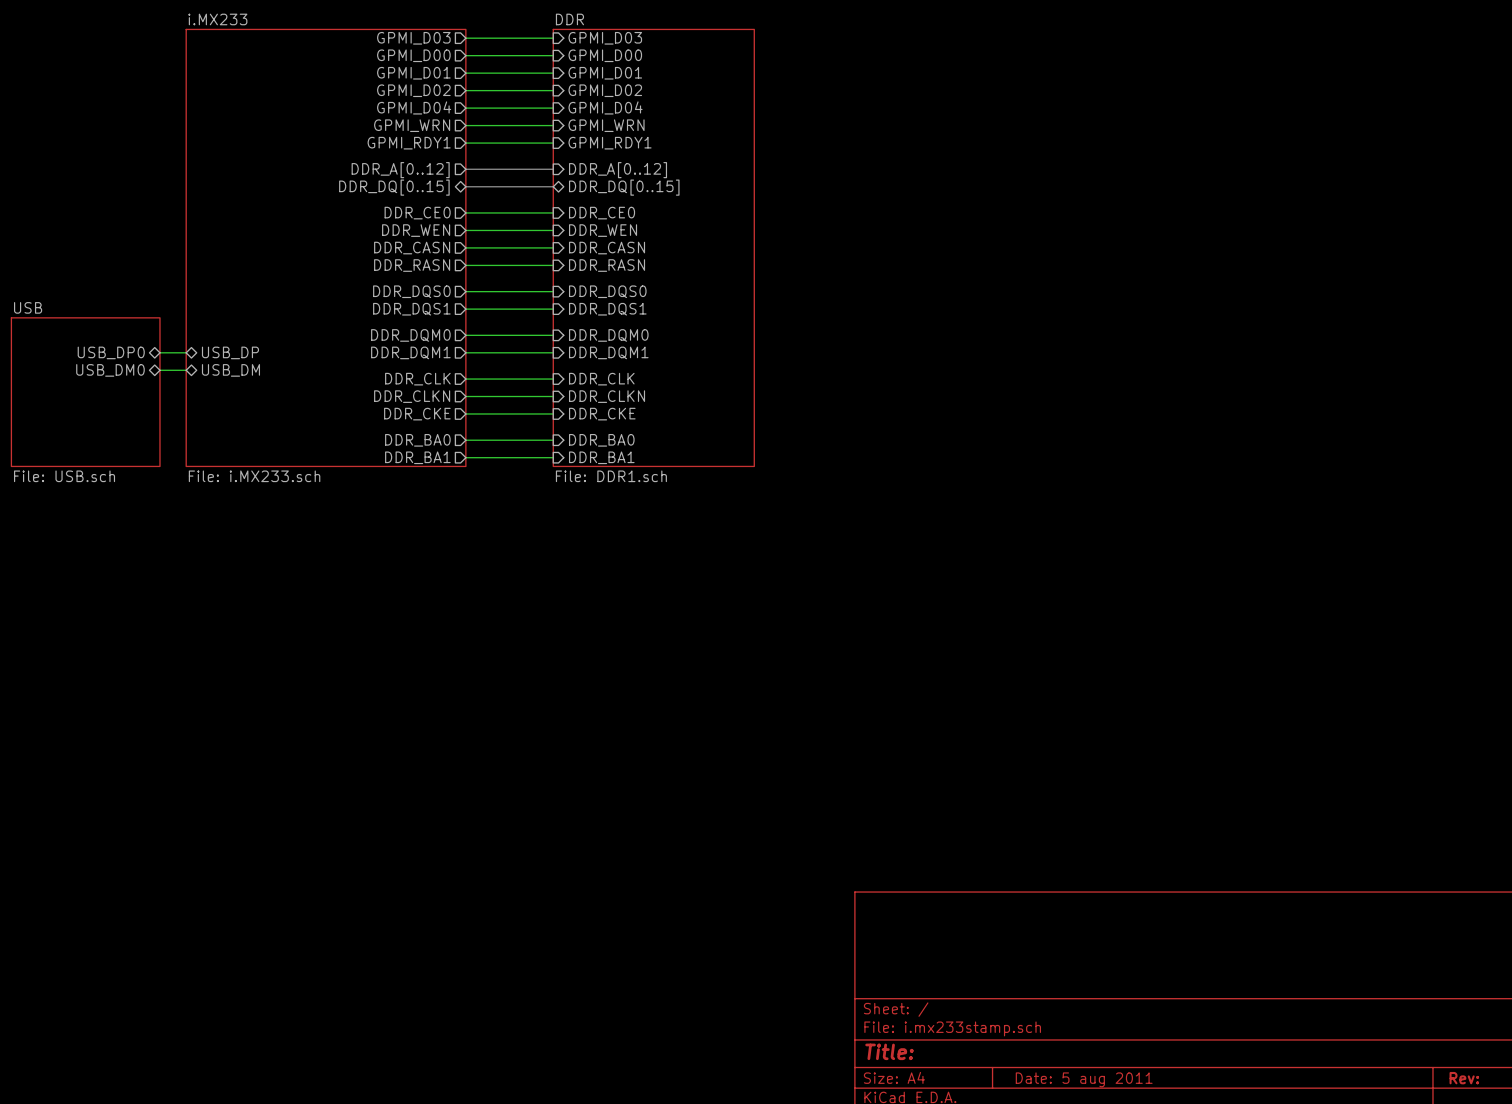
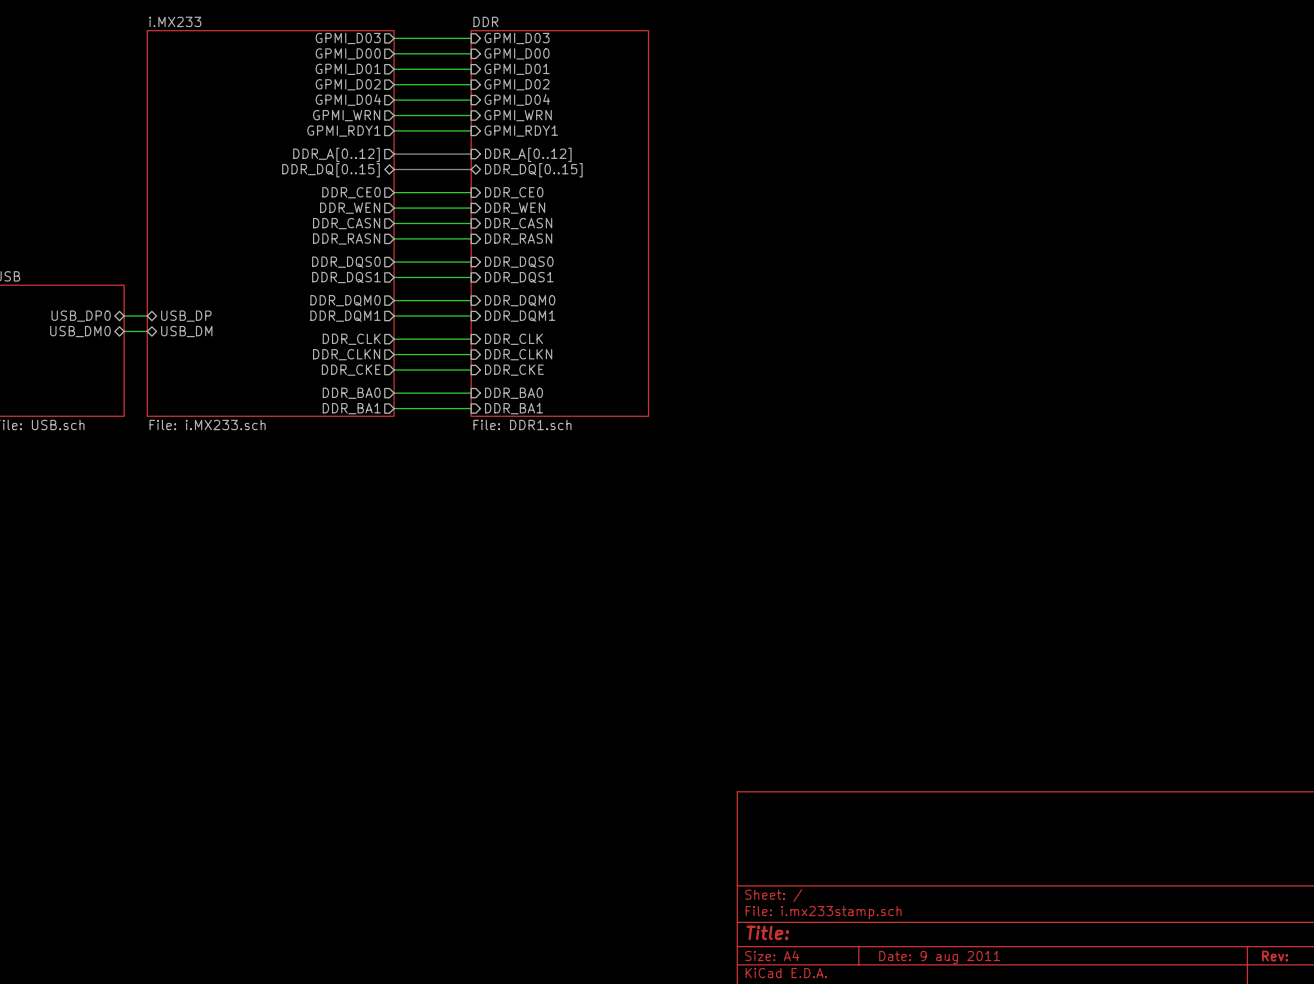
title block: Date: 5 aug 2011 (1084, 1079) -> Date: 9 aug 2011 (939, 957)

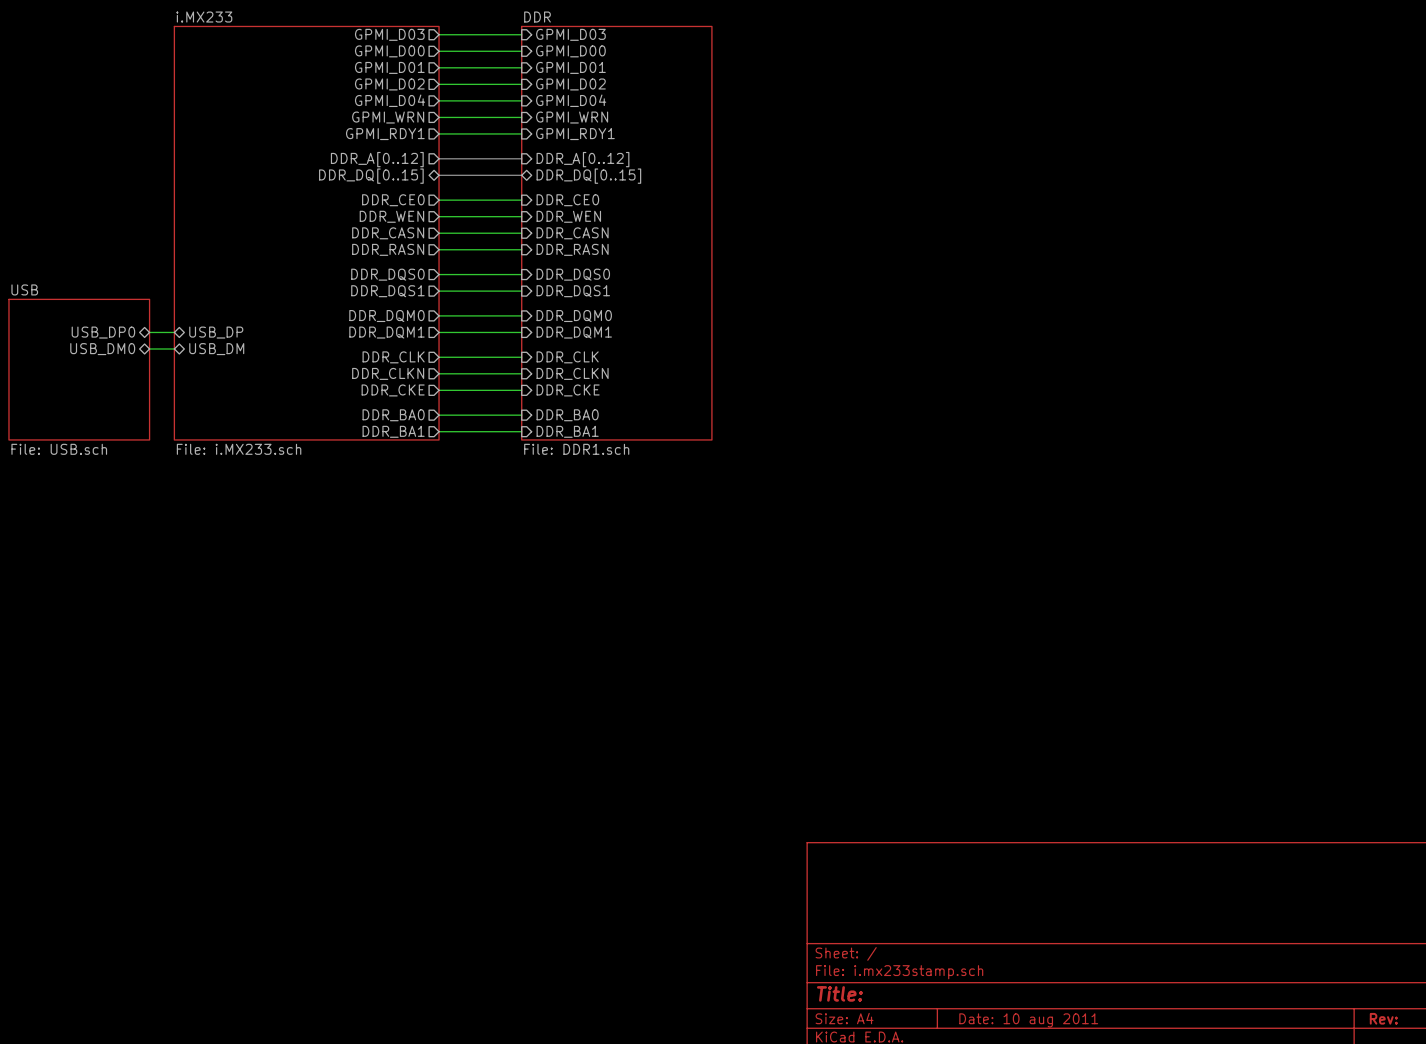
title block: Date: 9 aug 2011 (939, 957) -> Date: 10 aug 2011 (1028, 1020)

